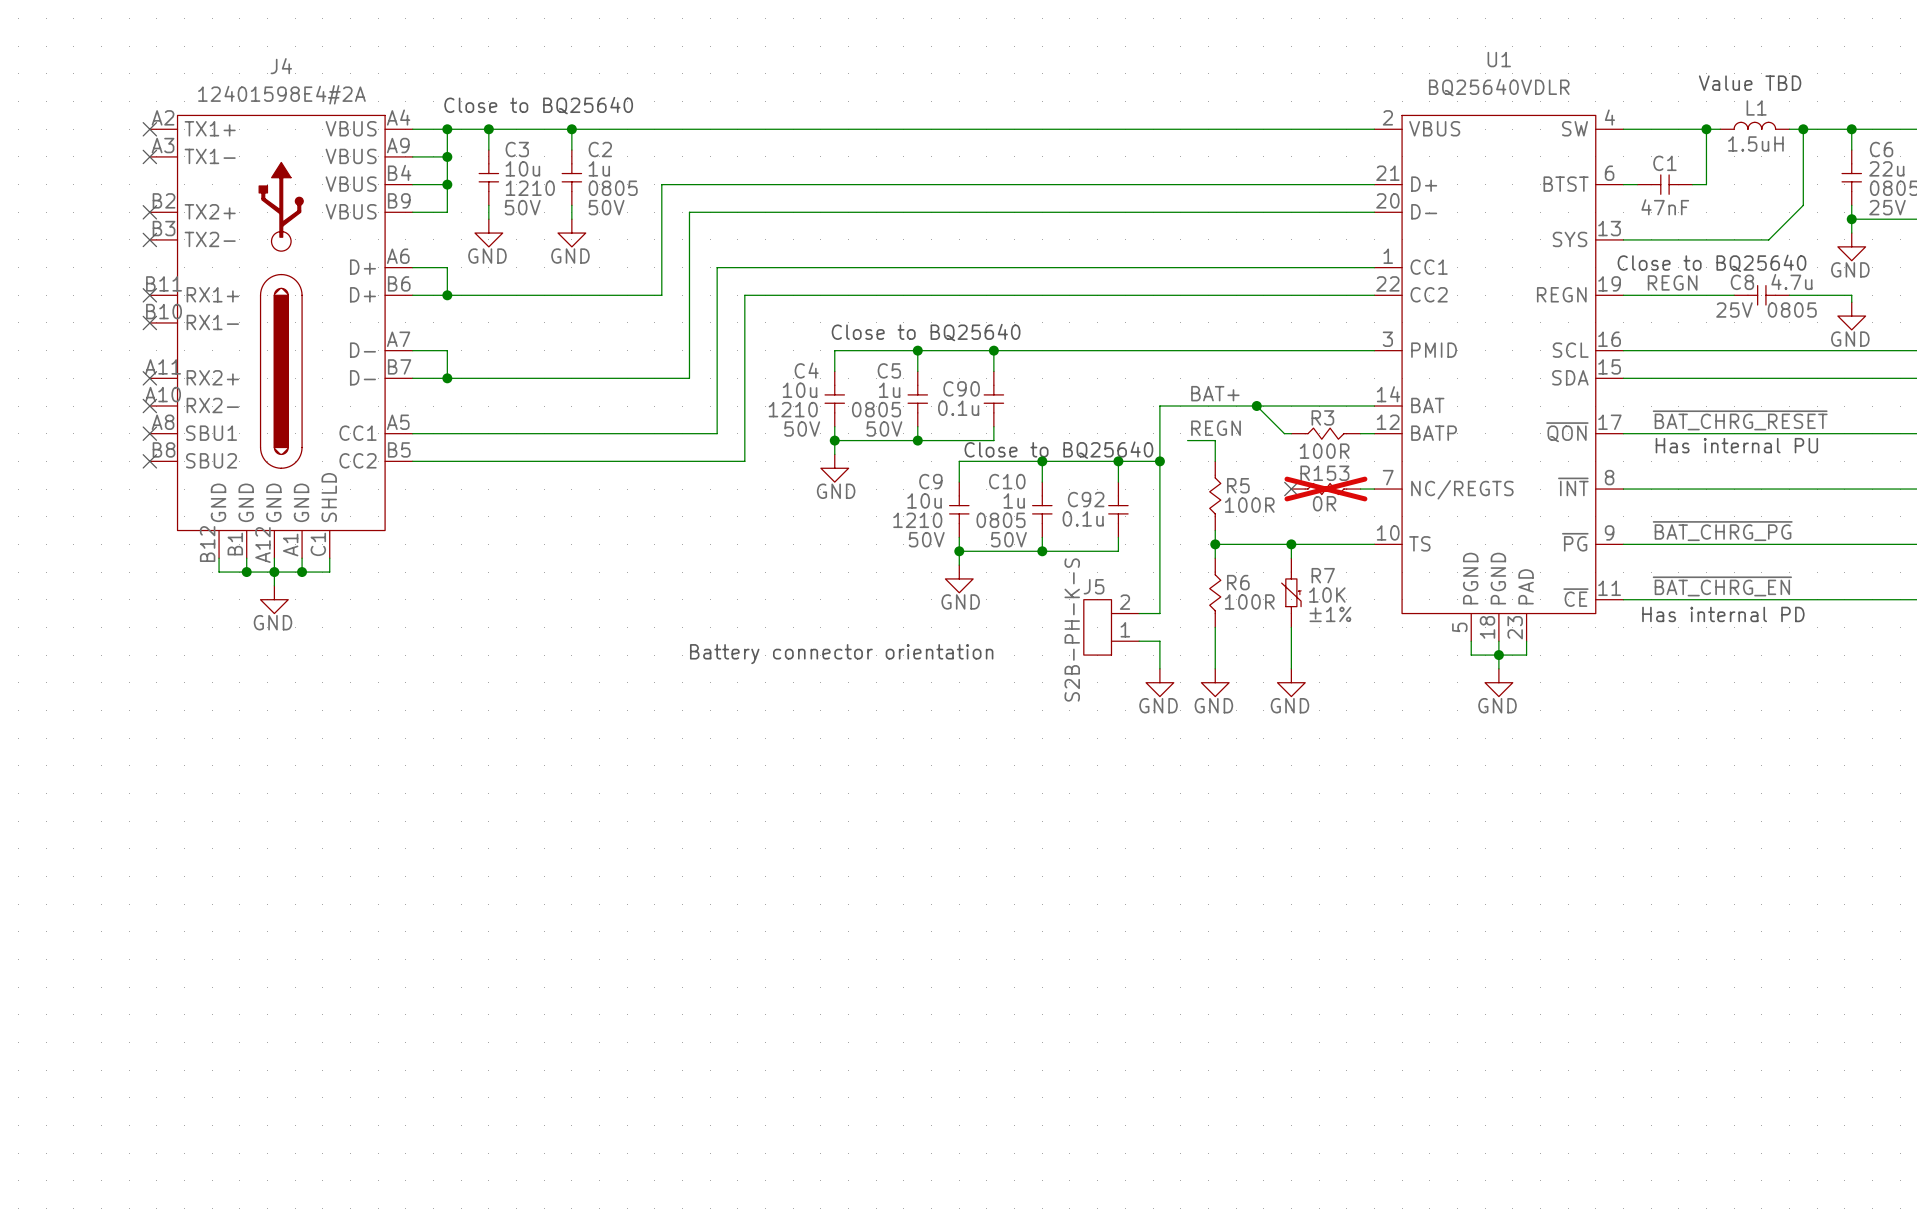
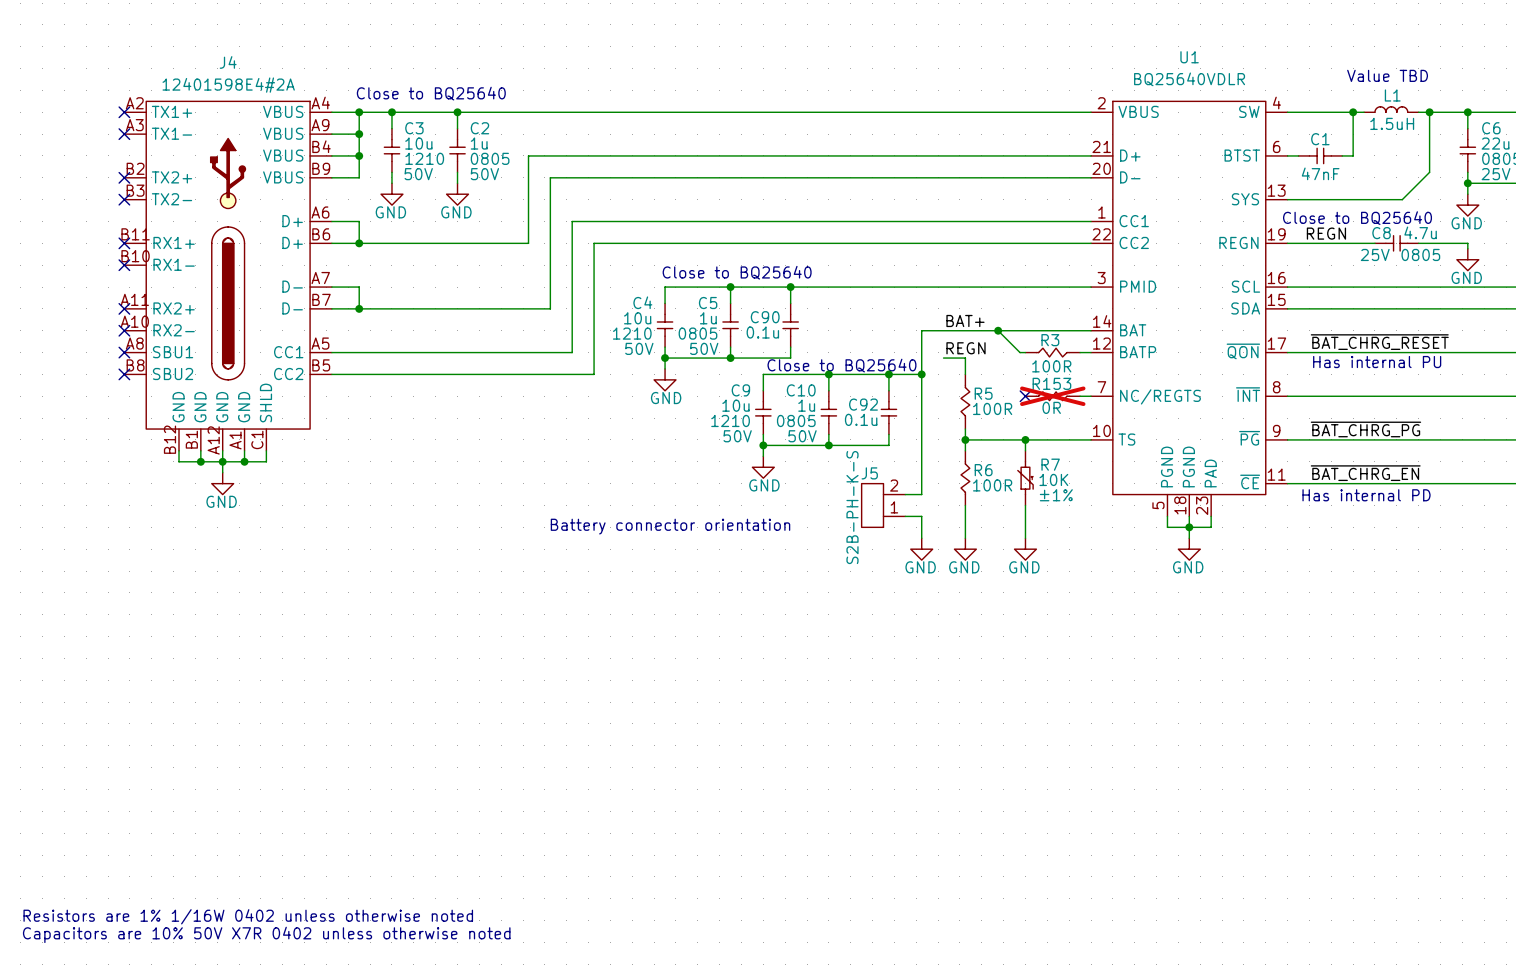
text: none -> Resistors are 1% 1/16W 0402 unless otherwise noted (248, 916)
text: none -> Capacitors are 10% 50V X7R 0402 unless otherwise noted (266, 934)

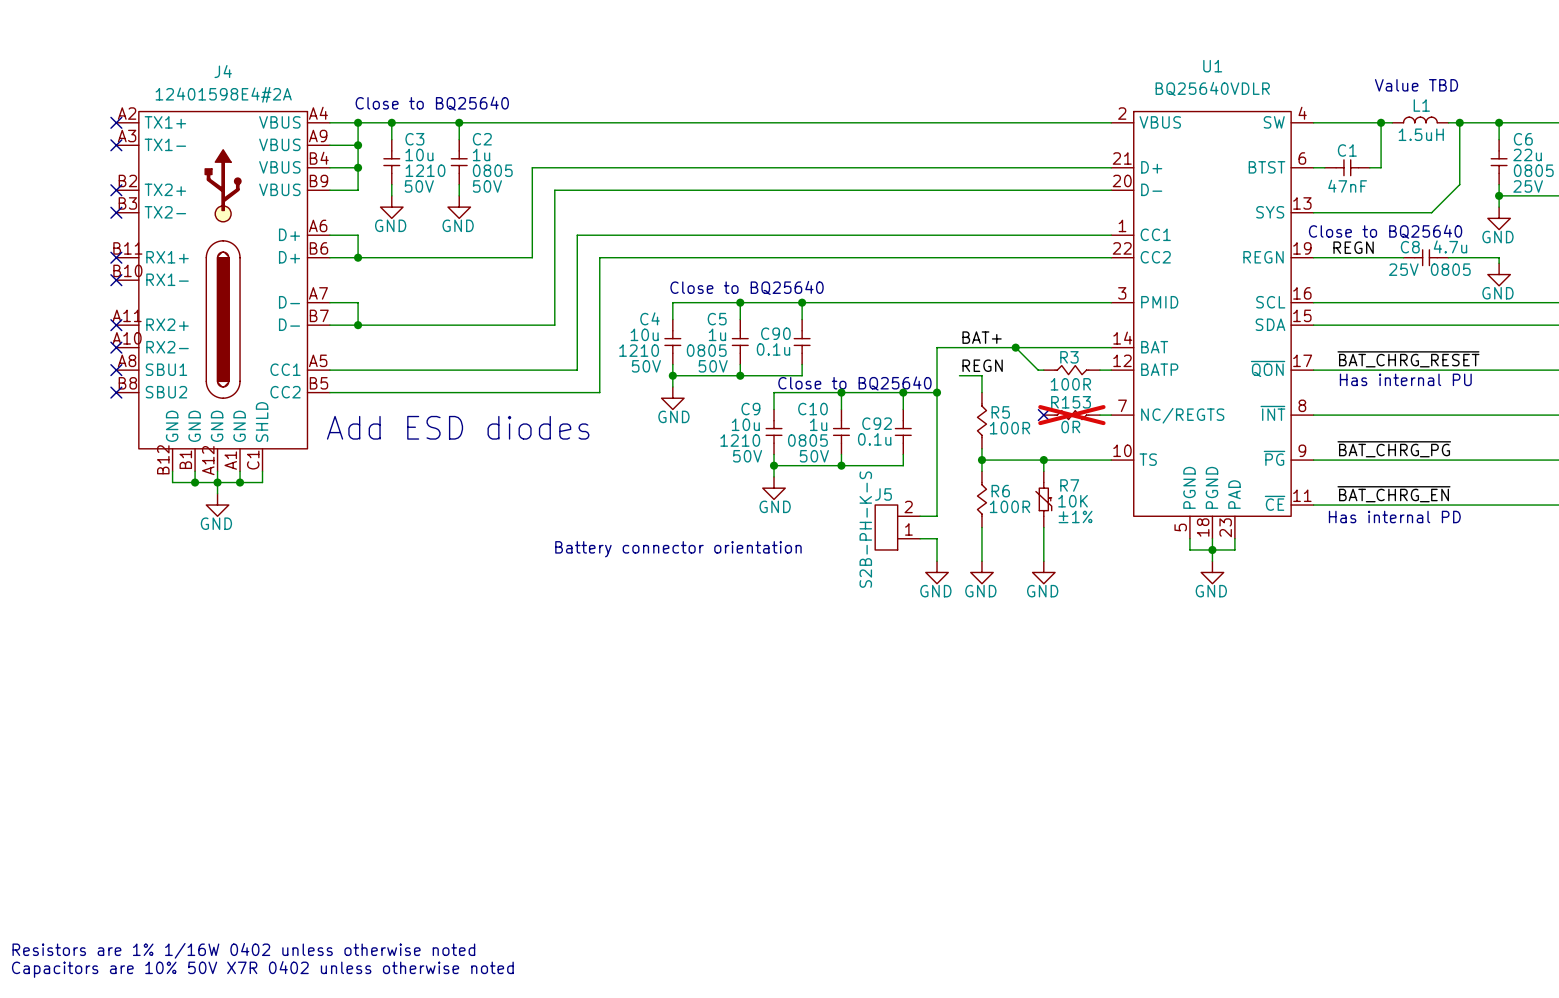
text: none -> Add ESD diodes (458, 427)

